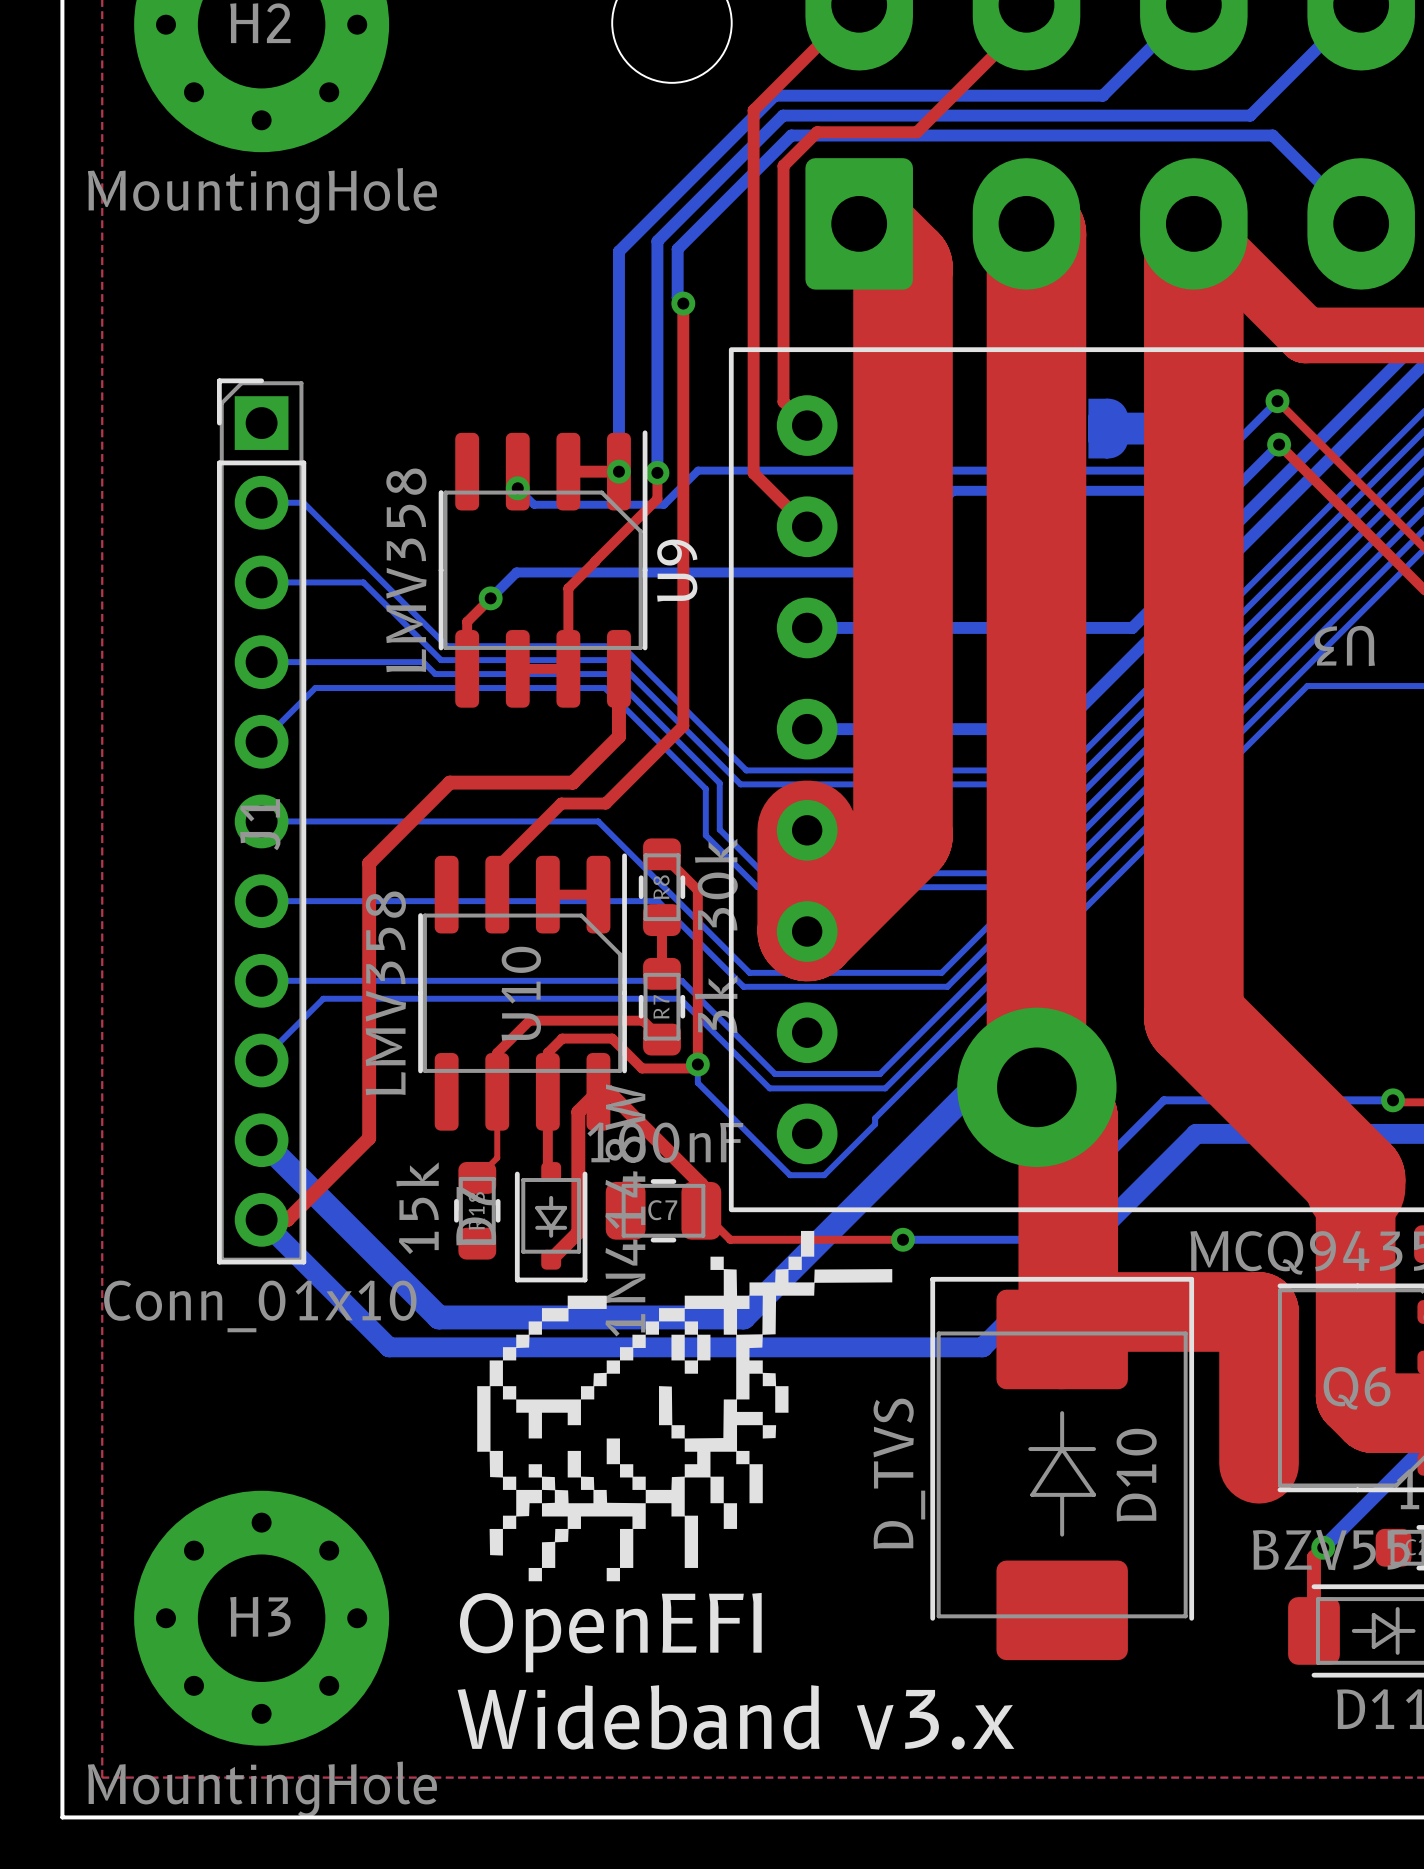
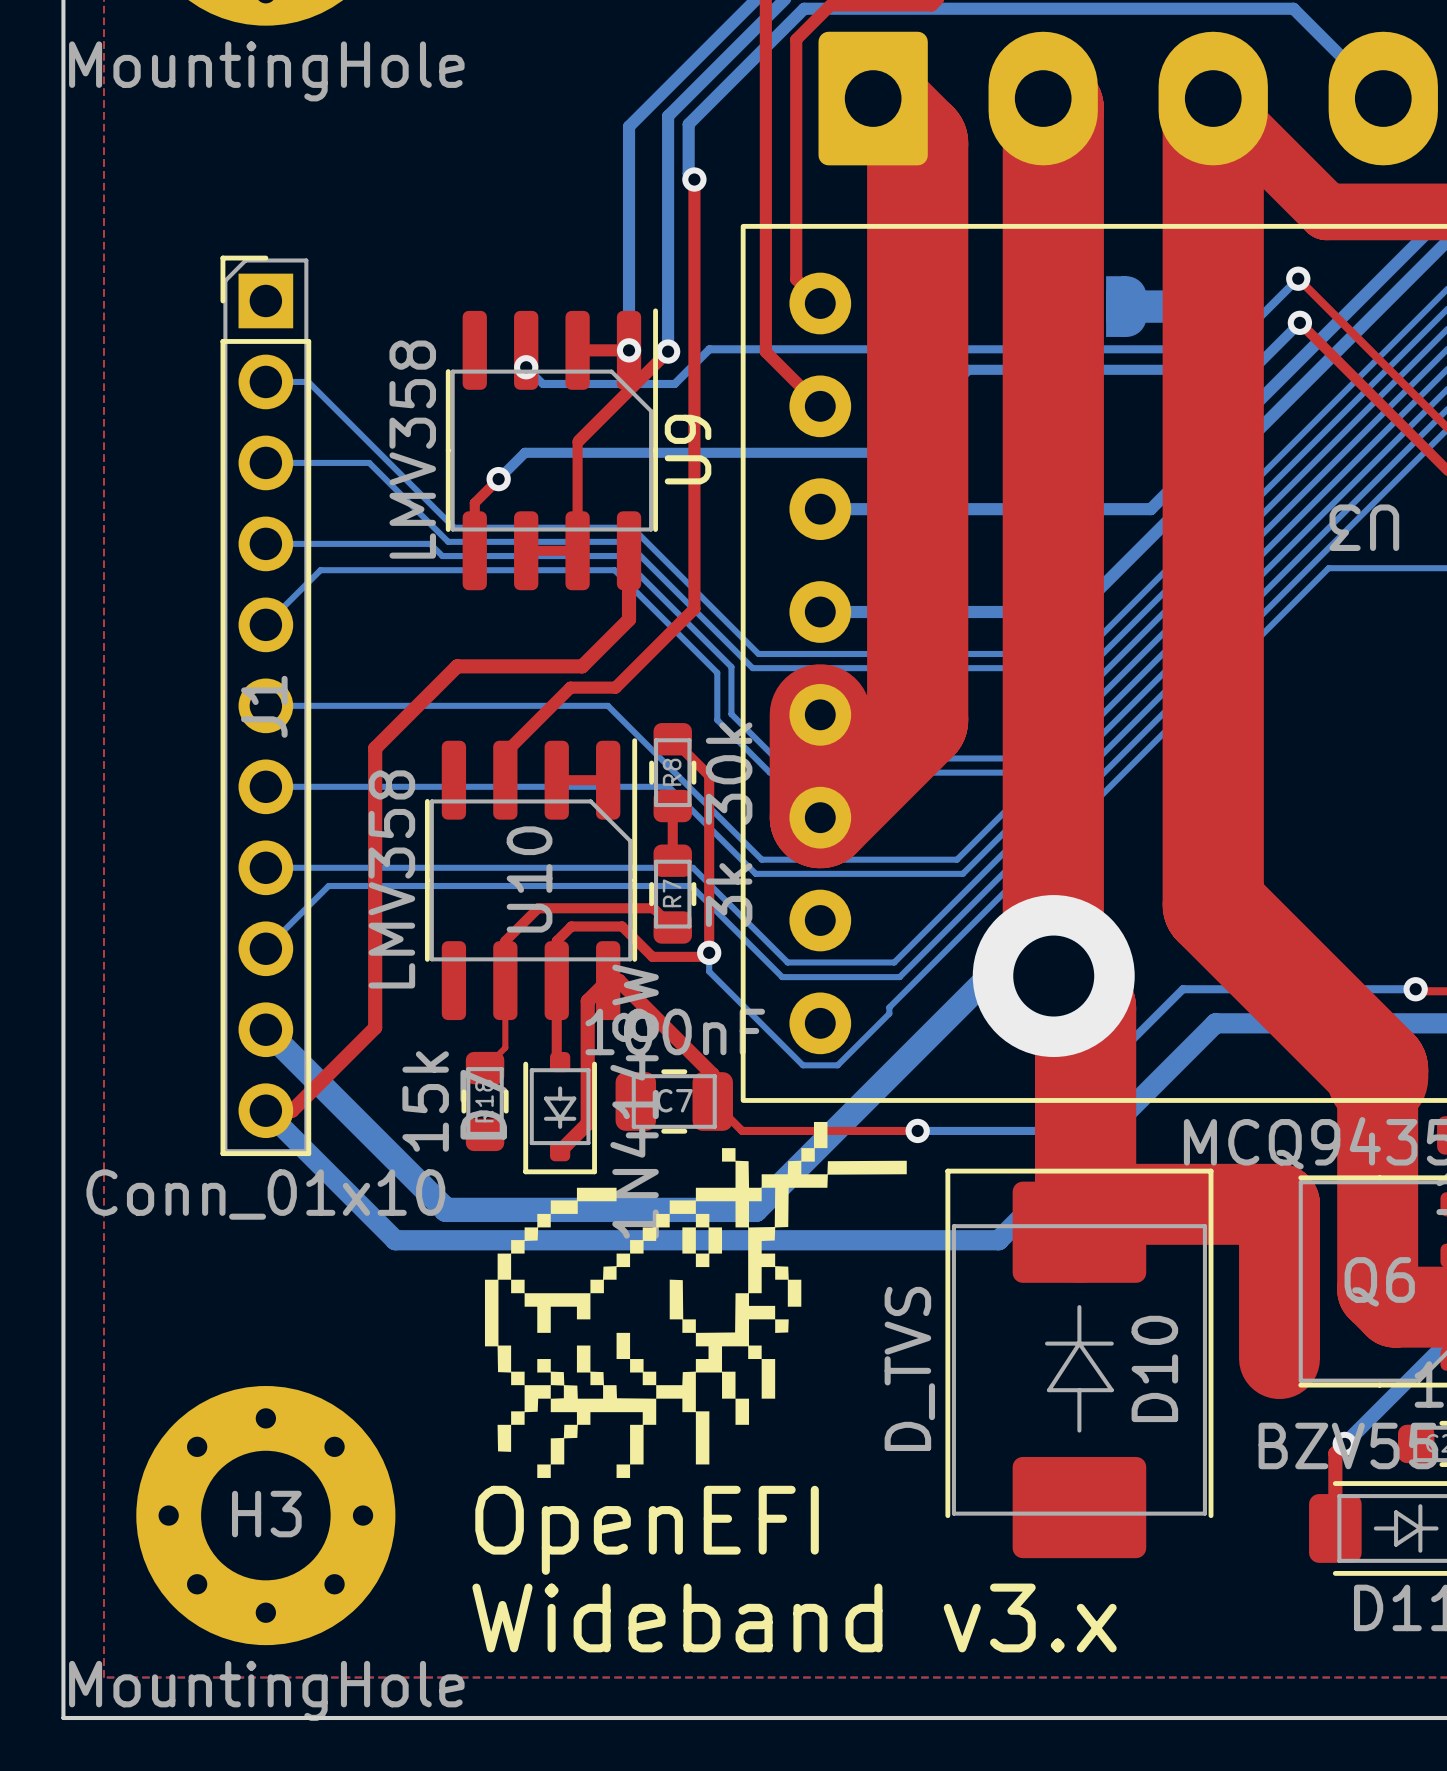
top track: (657, 472) (657, 498) (595, 560) -> (668, 351) (577, 442) (577, 469)
top track: (595, 561) (568, 588) -> none

